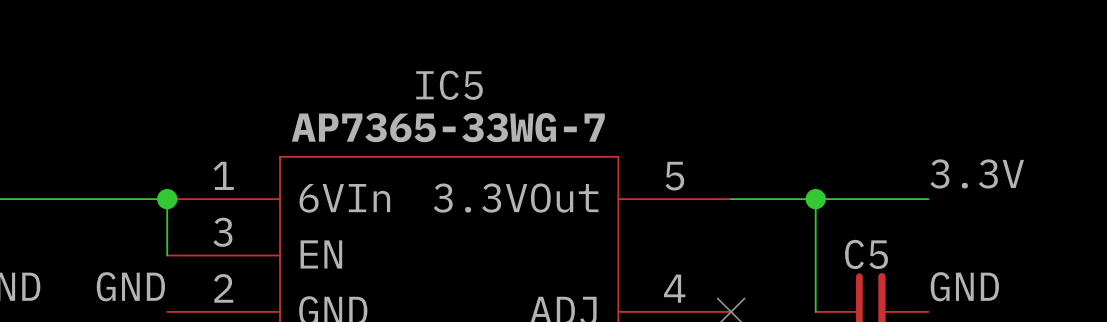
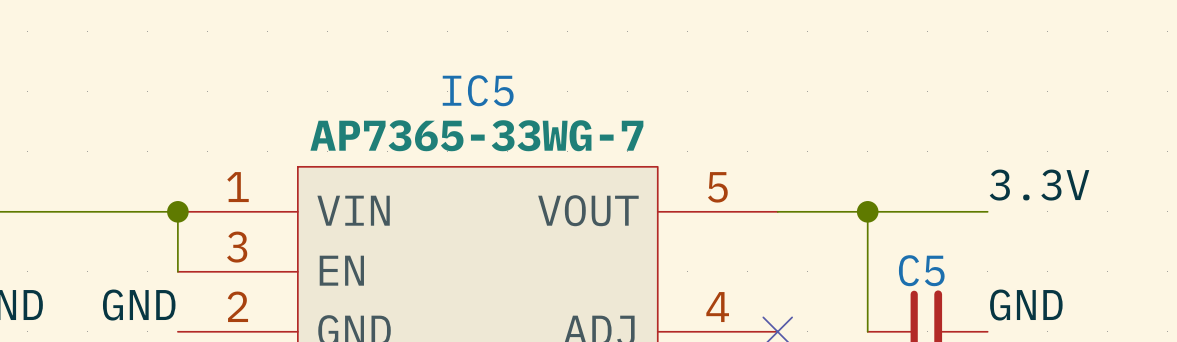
IC5 pin name: 6VIn (344, 198) -> VIN (353, 210)
IC5 pin name: 3.3VOut (516, 198) -> VOUT (588, 210)

